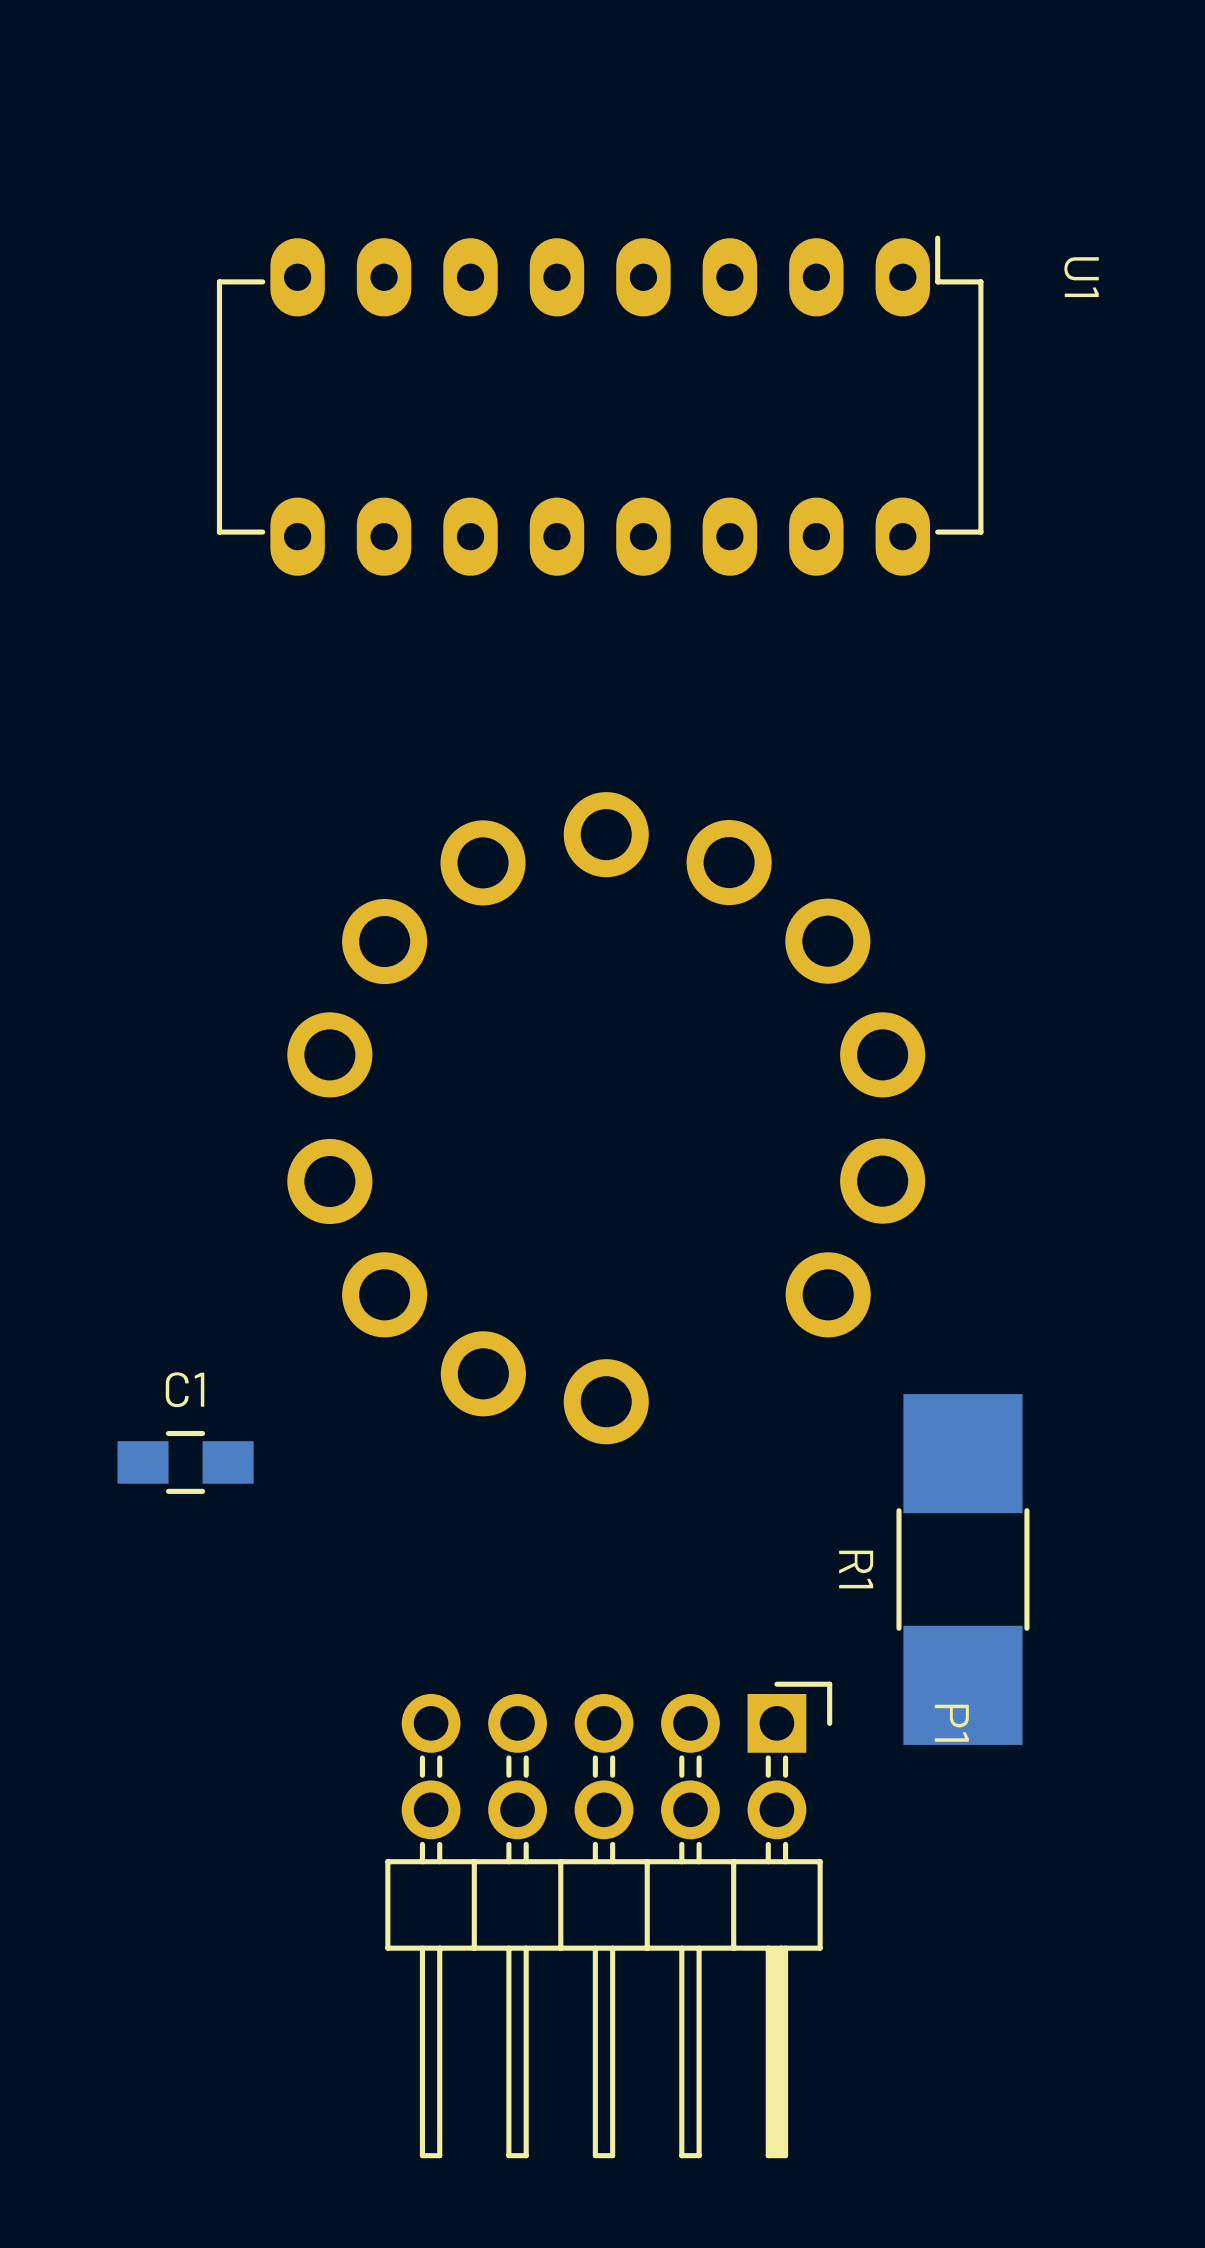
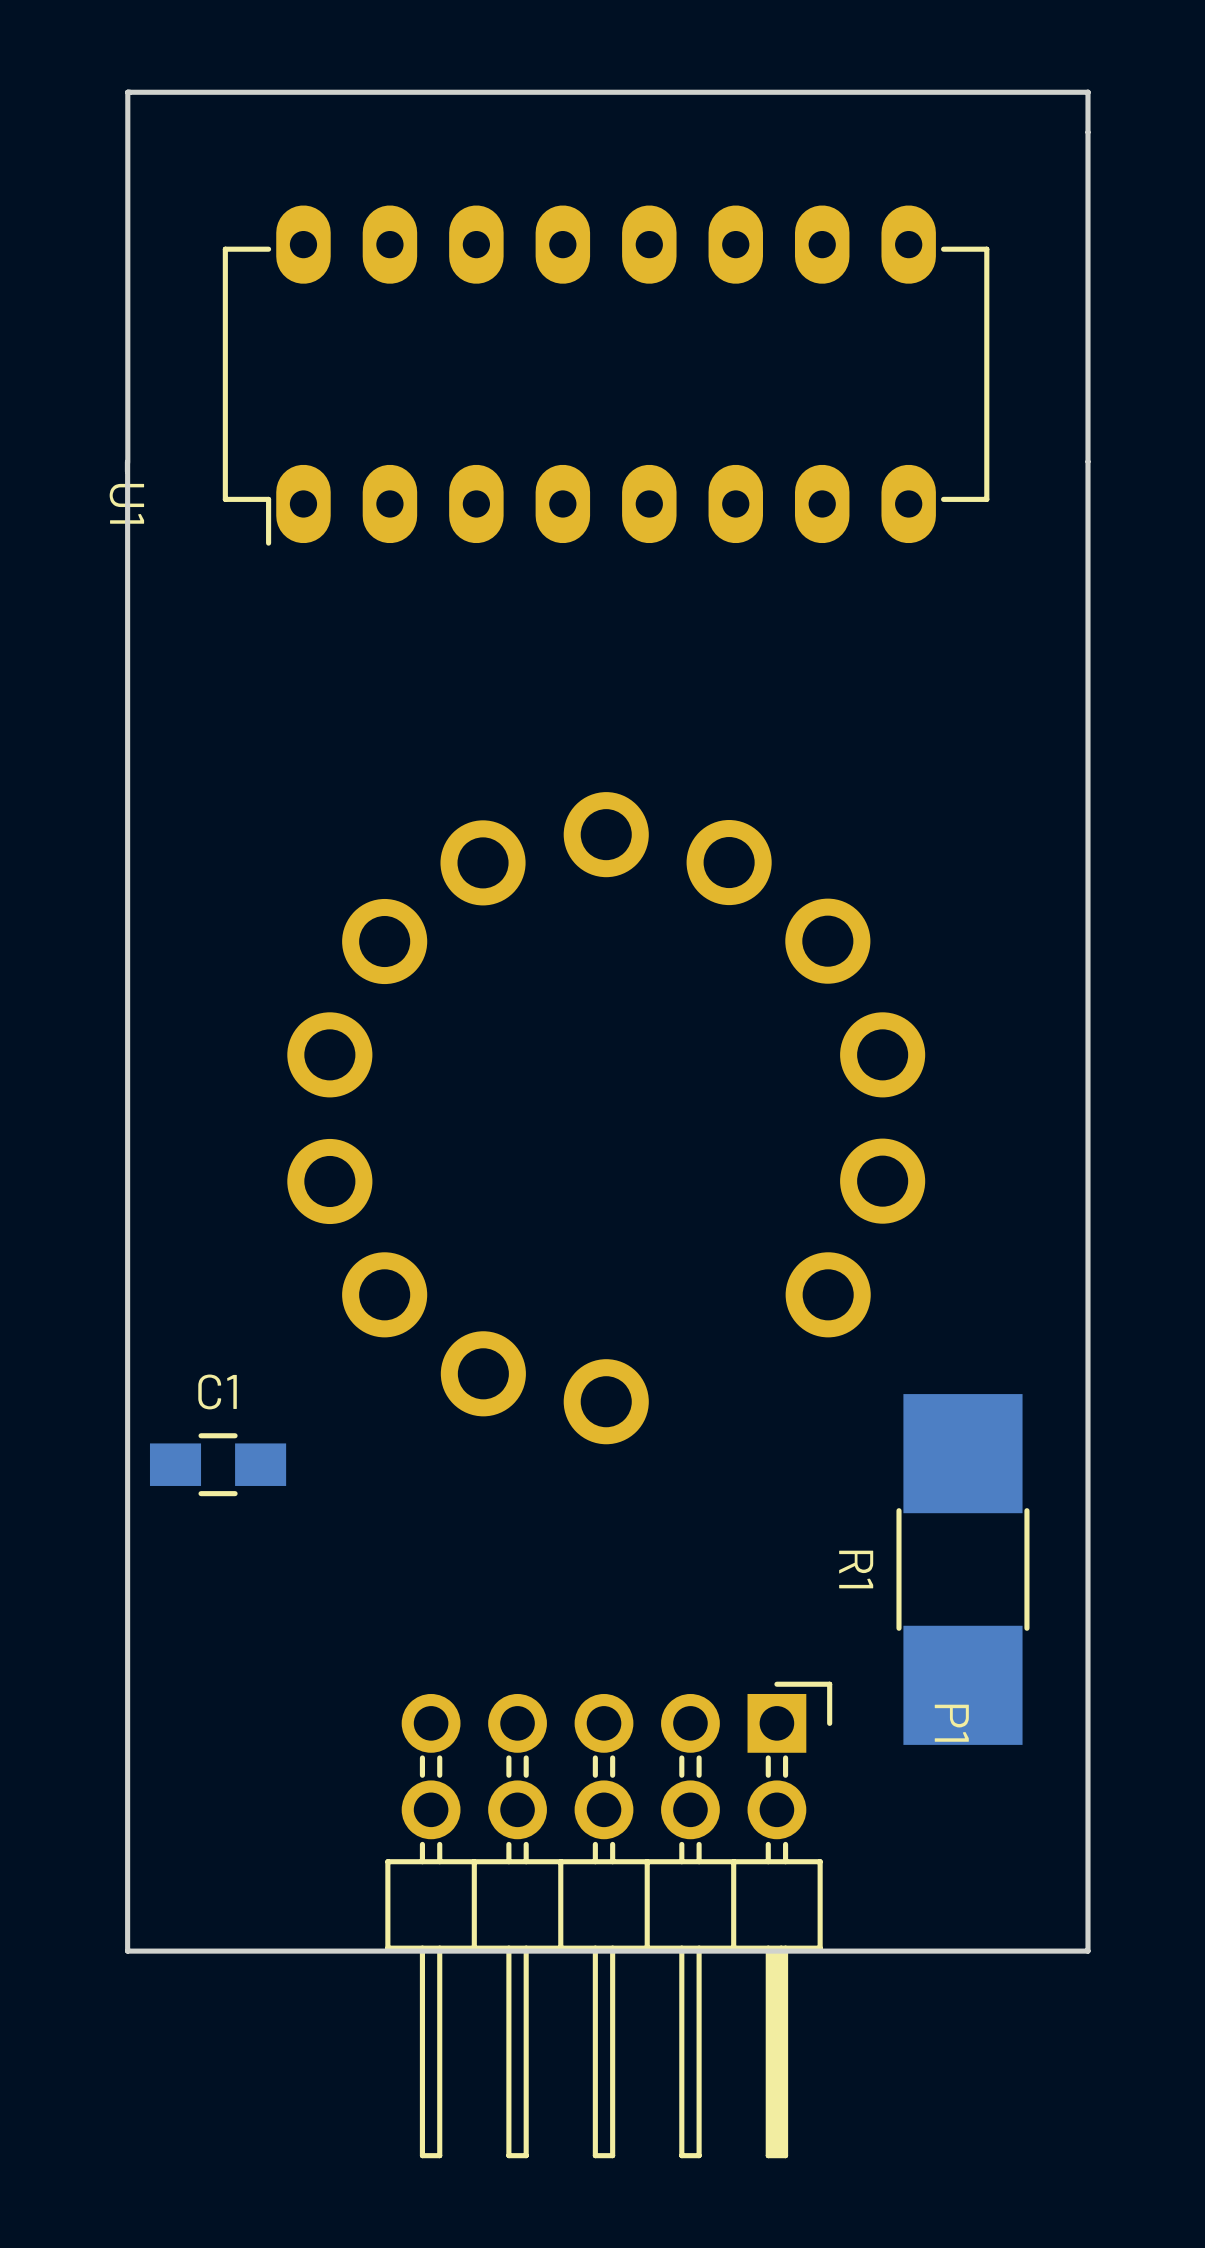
board edge: none -> (1087, 92) (1087, 1951) (127, 1951) (127, 463)
board edge: none -> (1088, 92) (127, 92) (127, 462)
U1 rotation: 0° (600, 405) -> 180° (606, 375)
C1 position: (185, 1462) -> (218, 1464)

